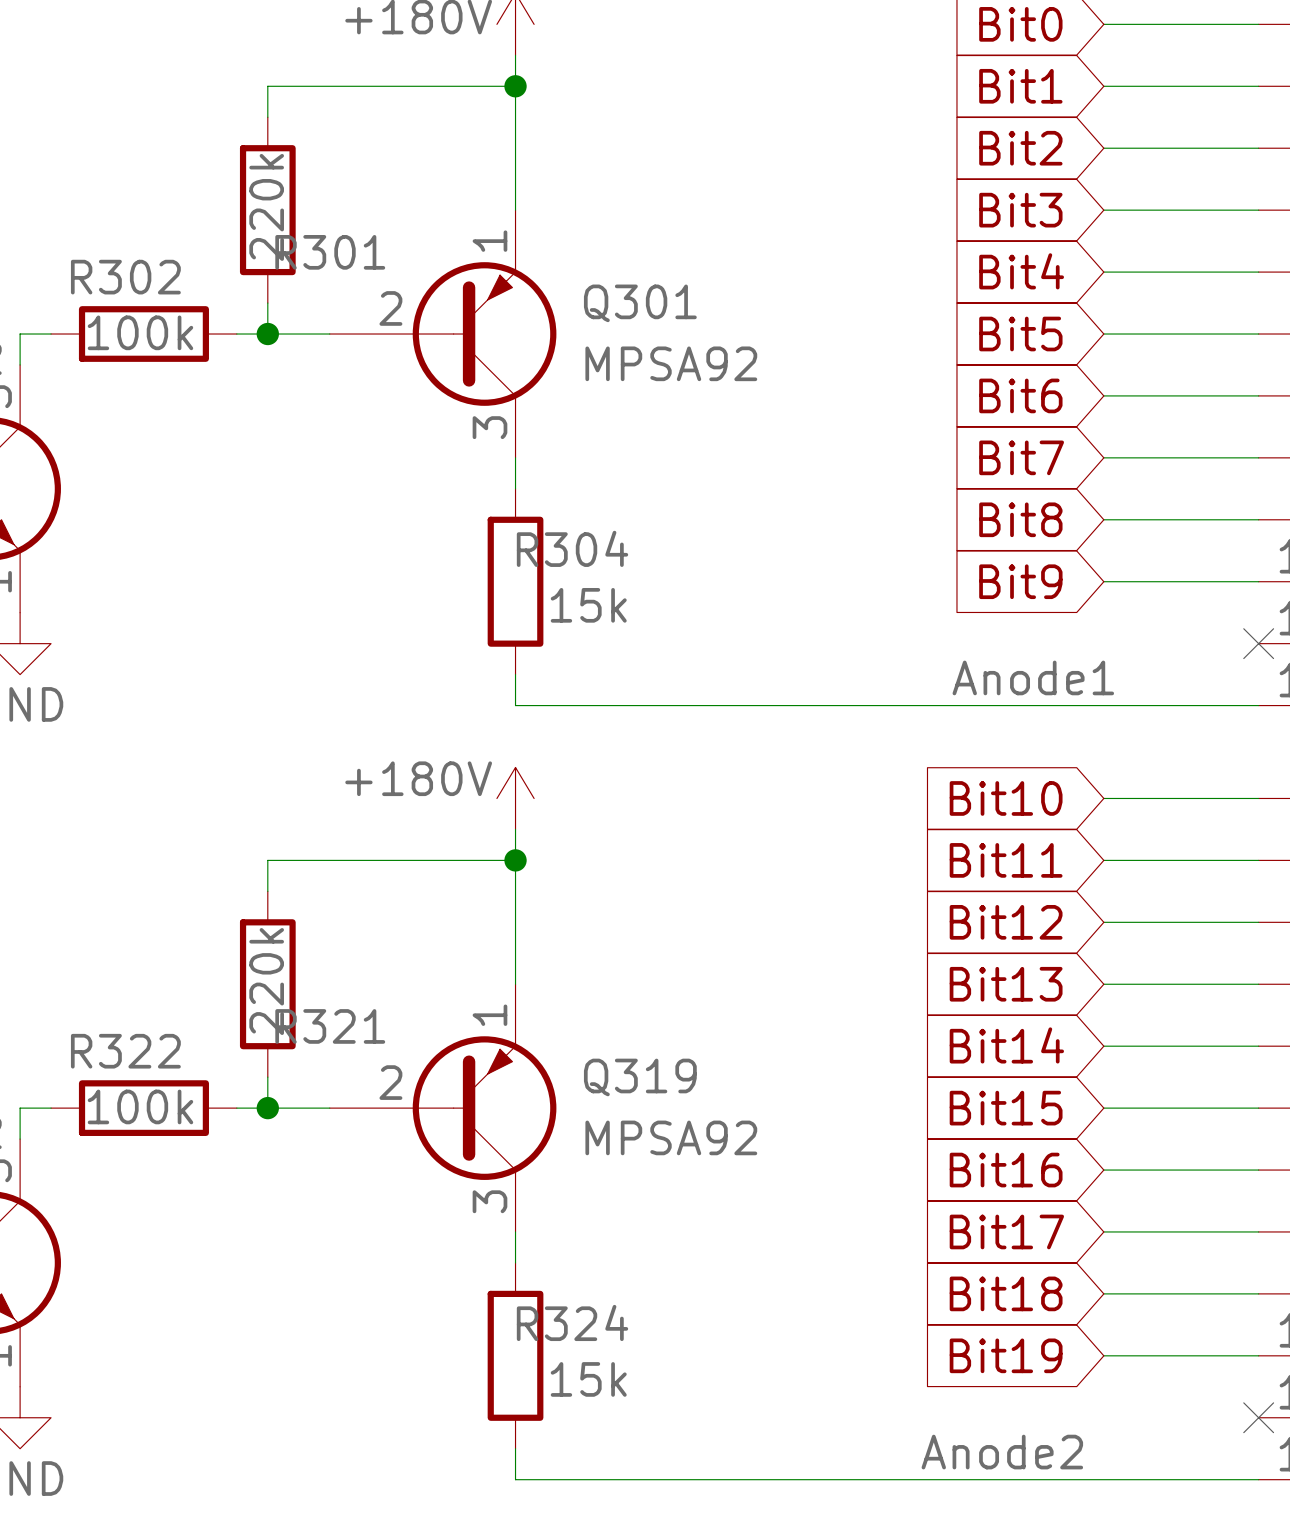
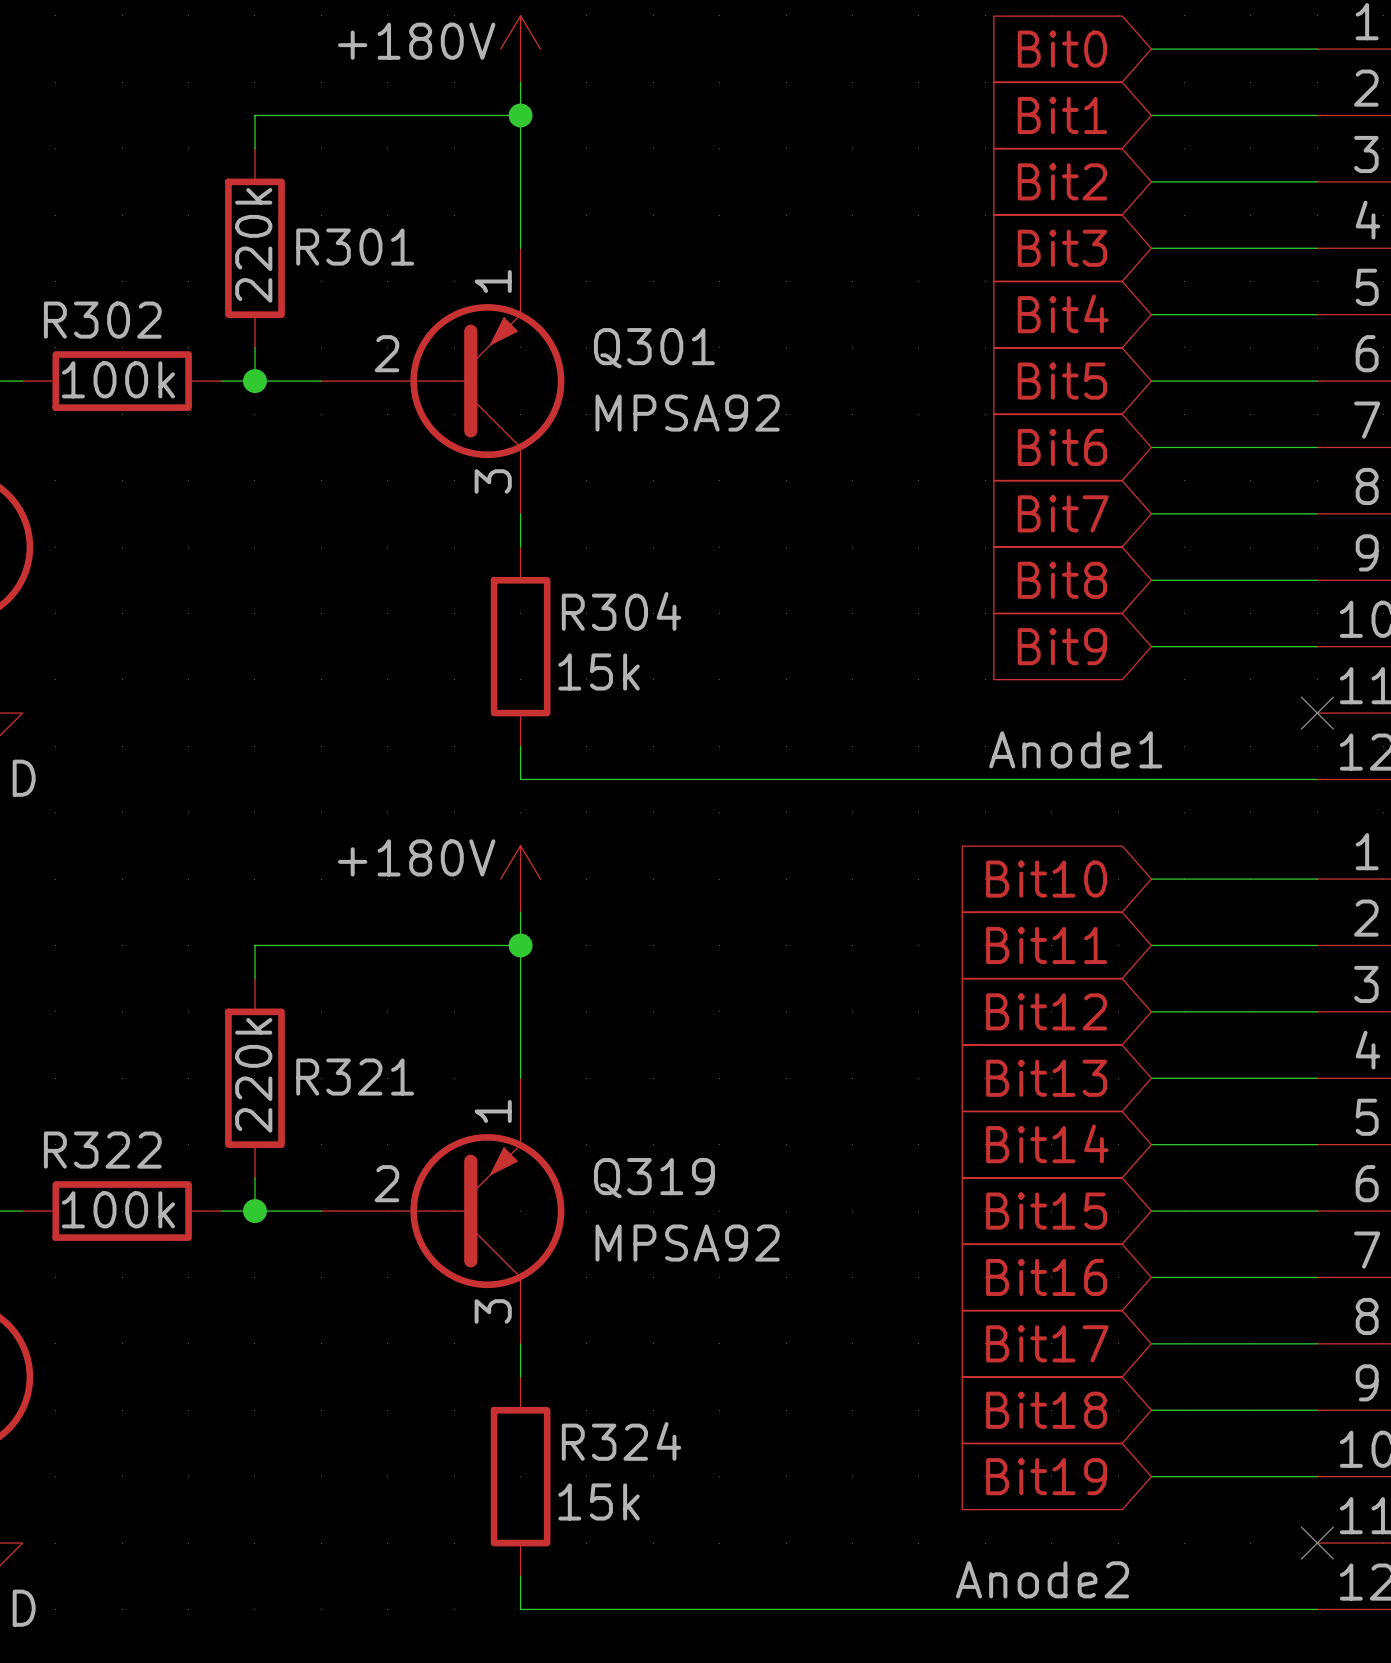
R301 name position: R301 (330, 252) -> R301 (355, 247)
R304 name position: R304 (572, 548) -> R304 (621, 611)
R321 name position: R321 (330, 1026) -> R321 (355, 1077)
R324 name position: R324 (572, 1322) -> R324 (621, 1441)

